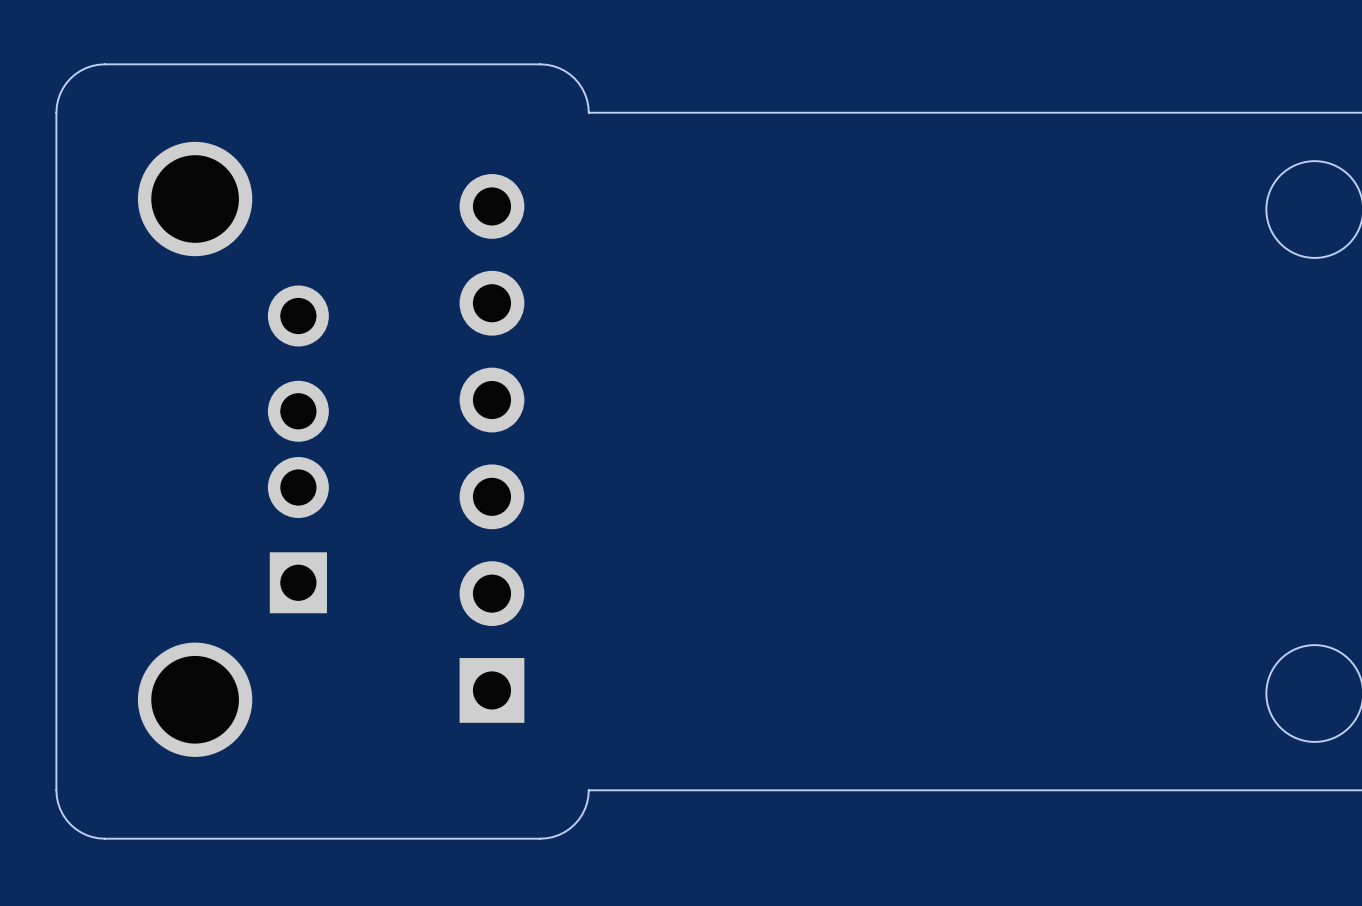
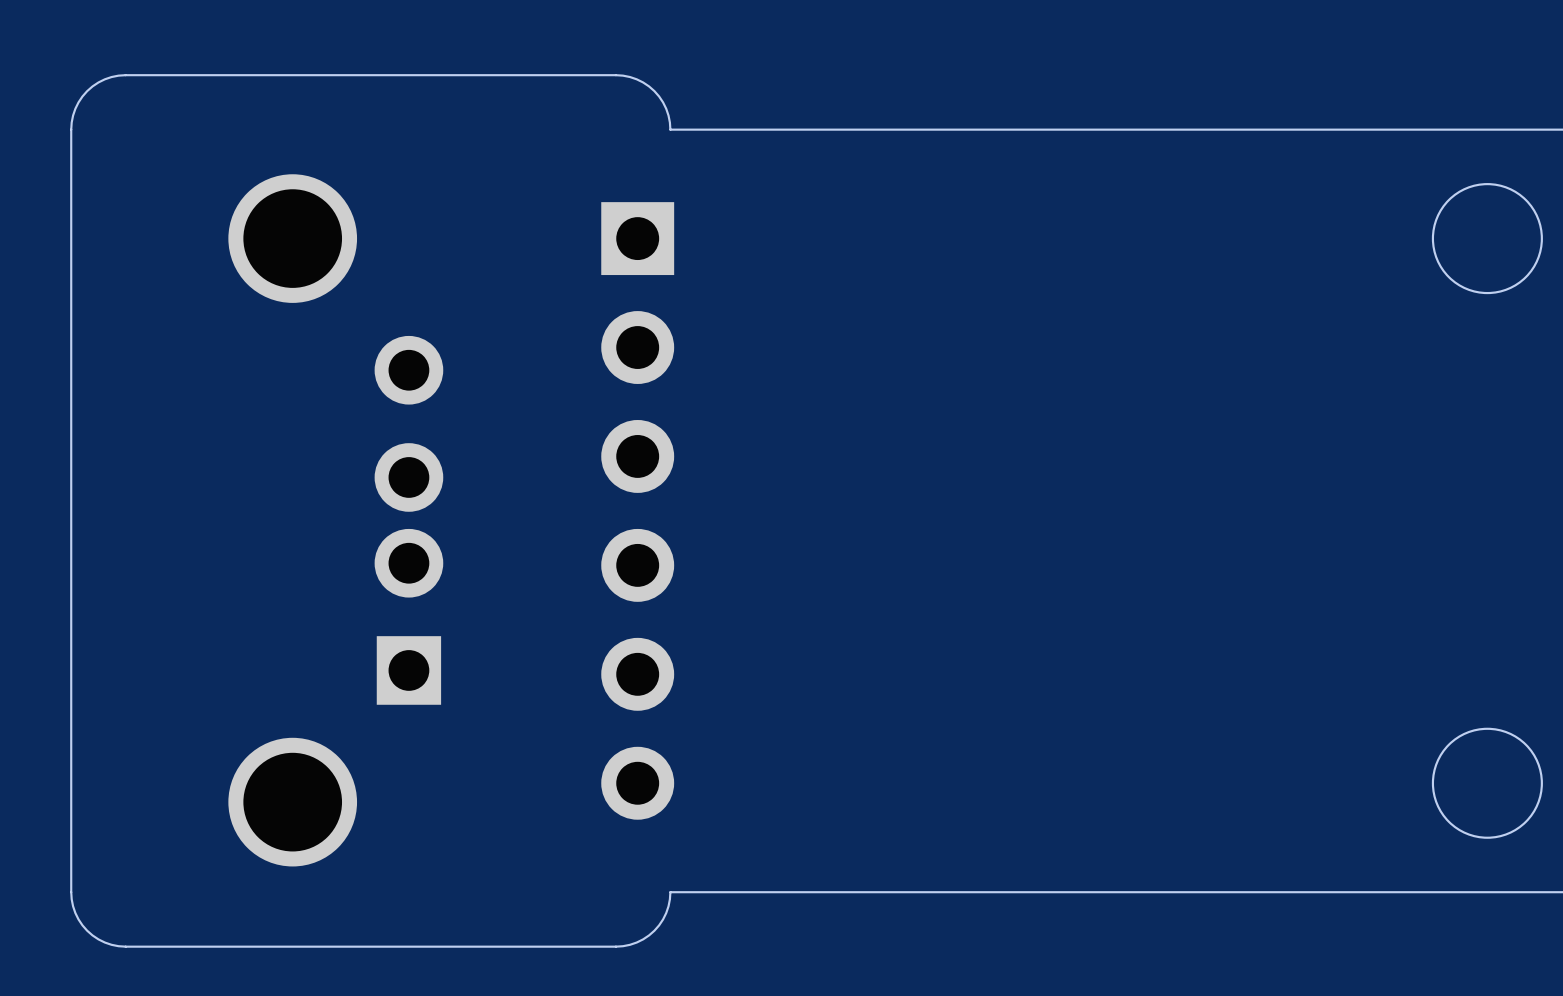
part rotation: 0° (491, 448) -> 180° (637, 510)
part position: (233, 449) -> (335, 520)

